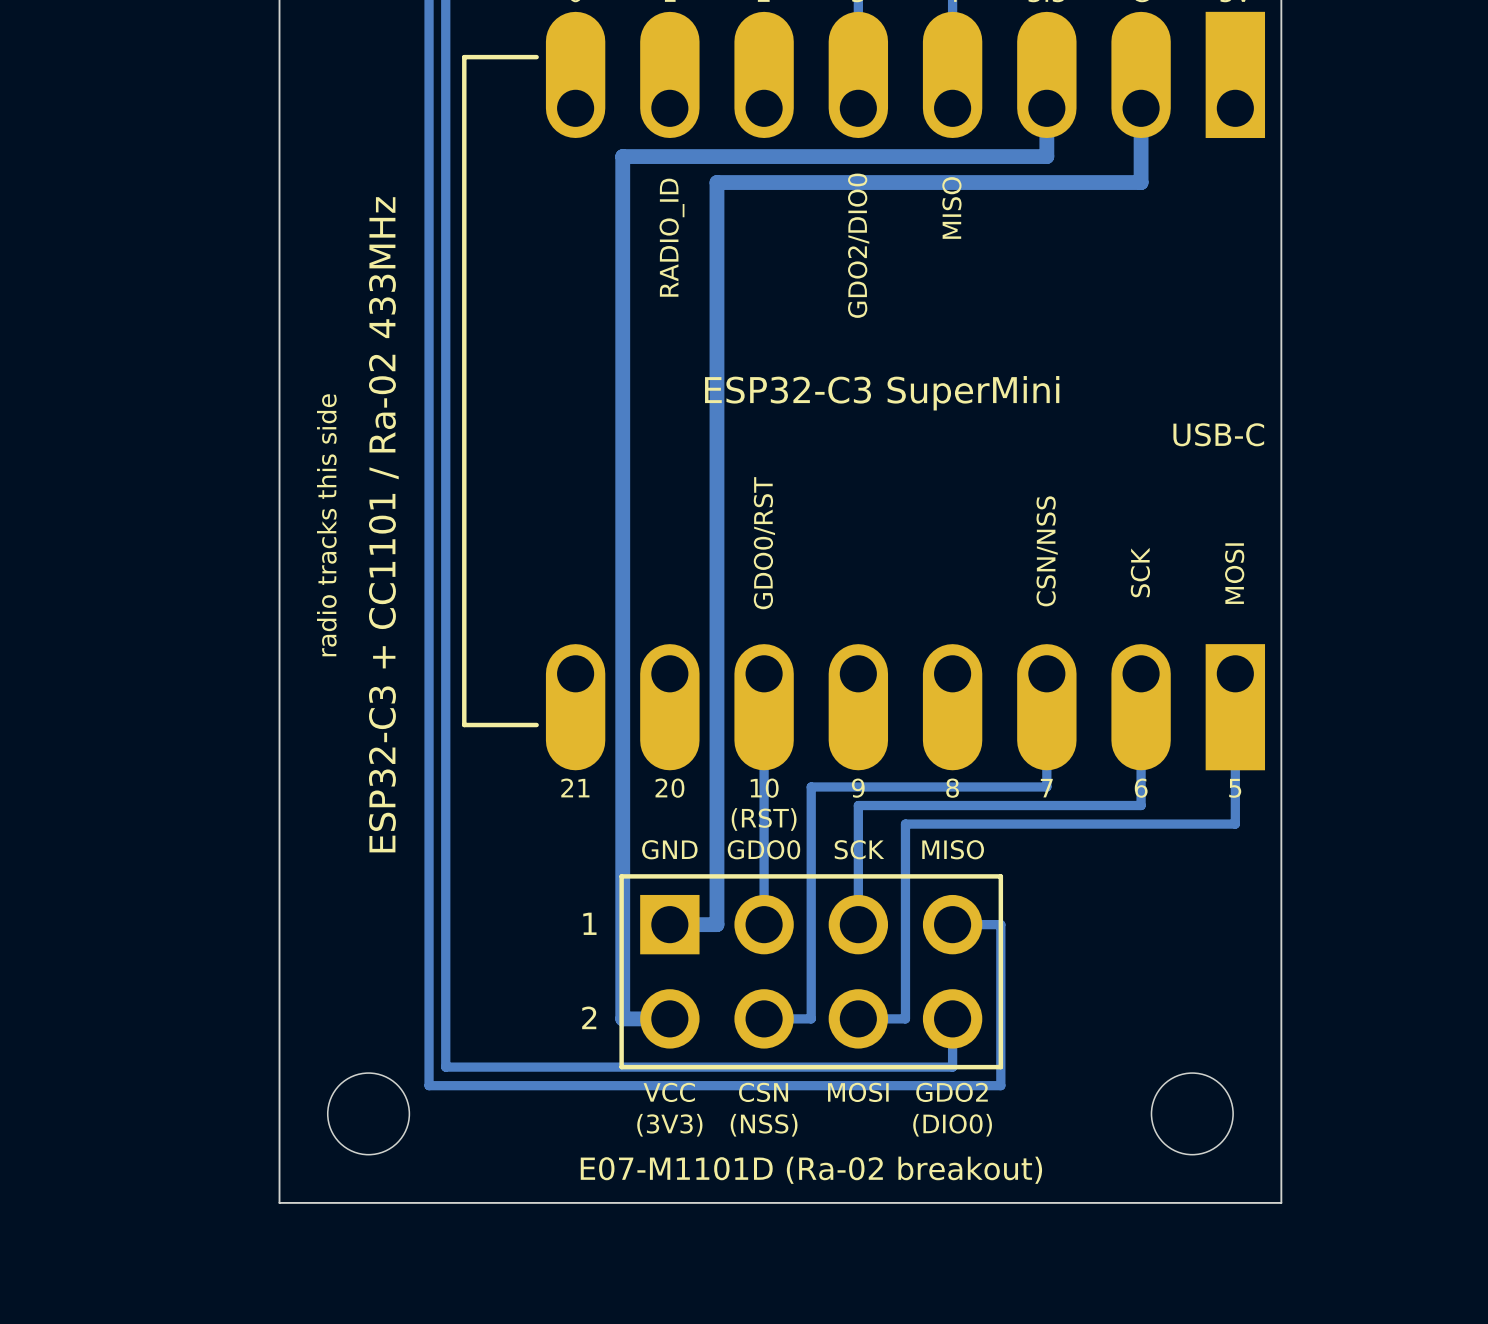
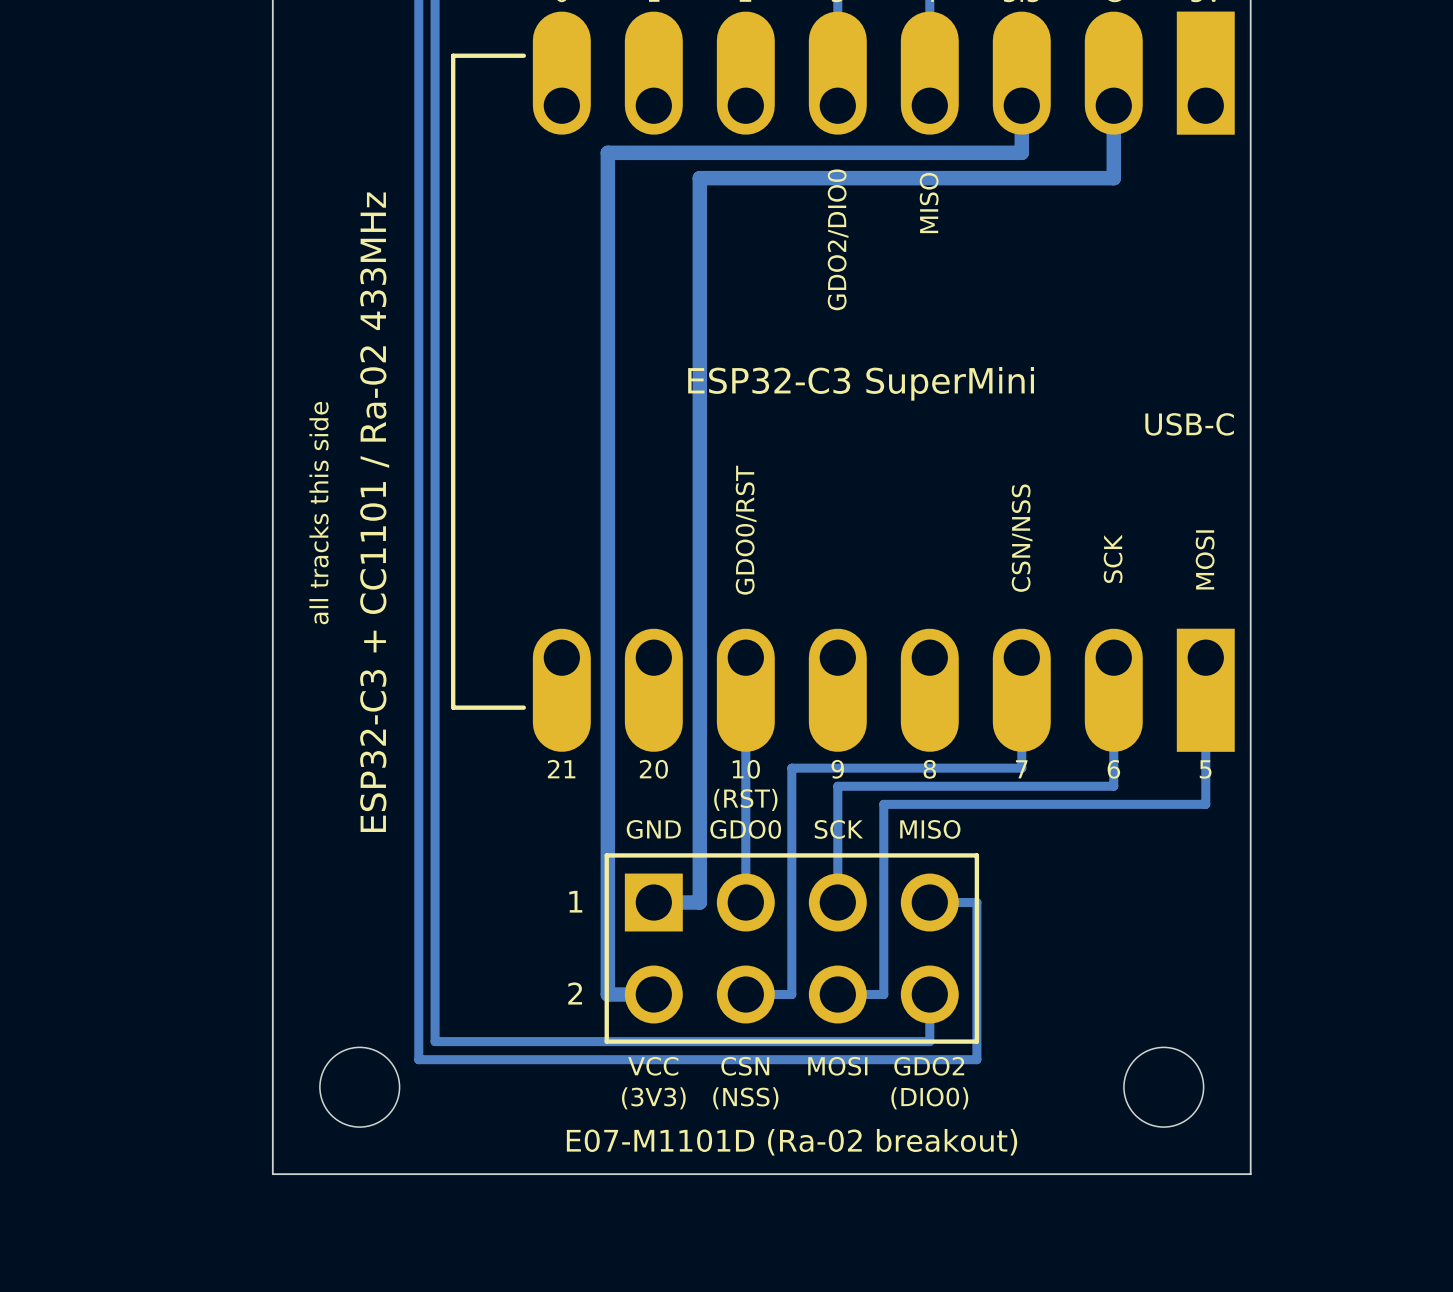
text: RADIO_ID (671, 237) -> none
text: radio tracks this side (326, 525) -> all tracks this side (319, 513)

